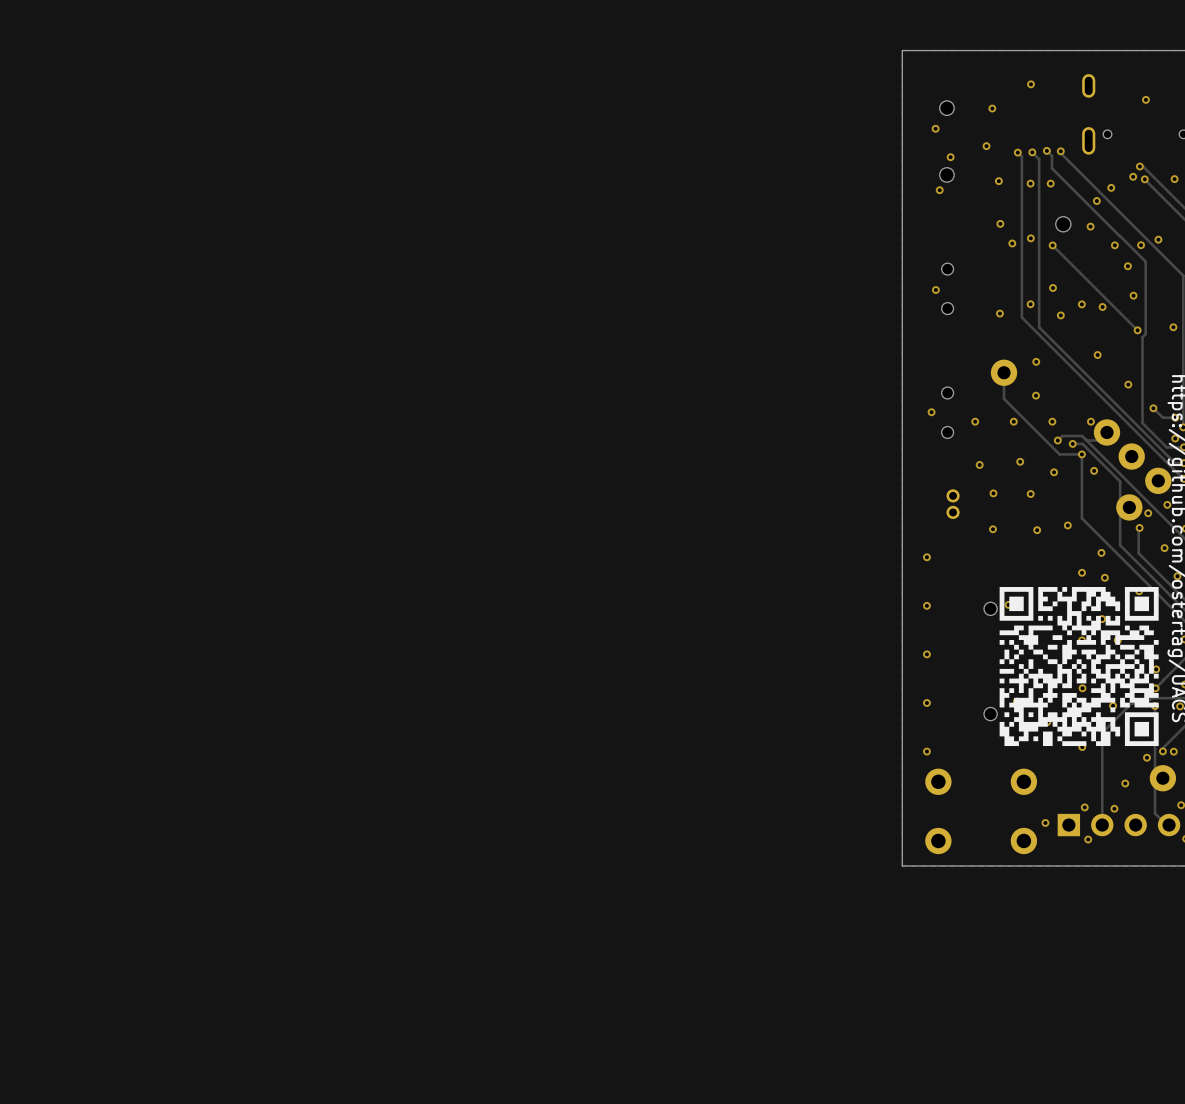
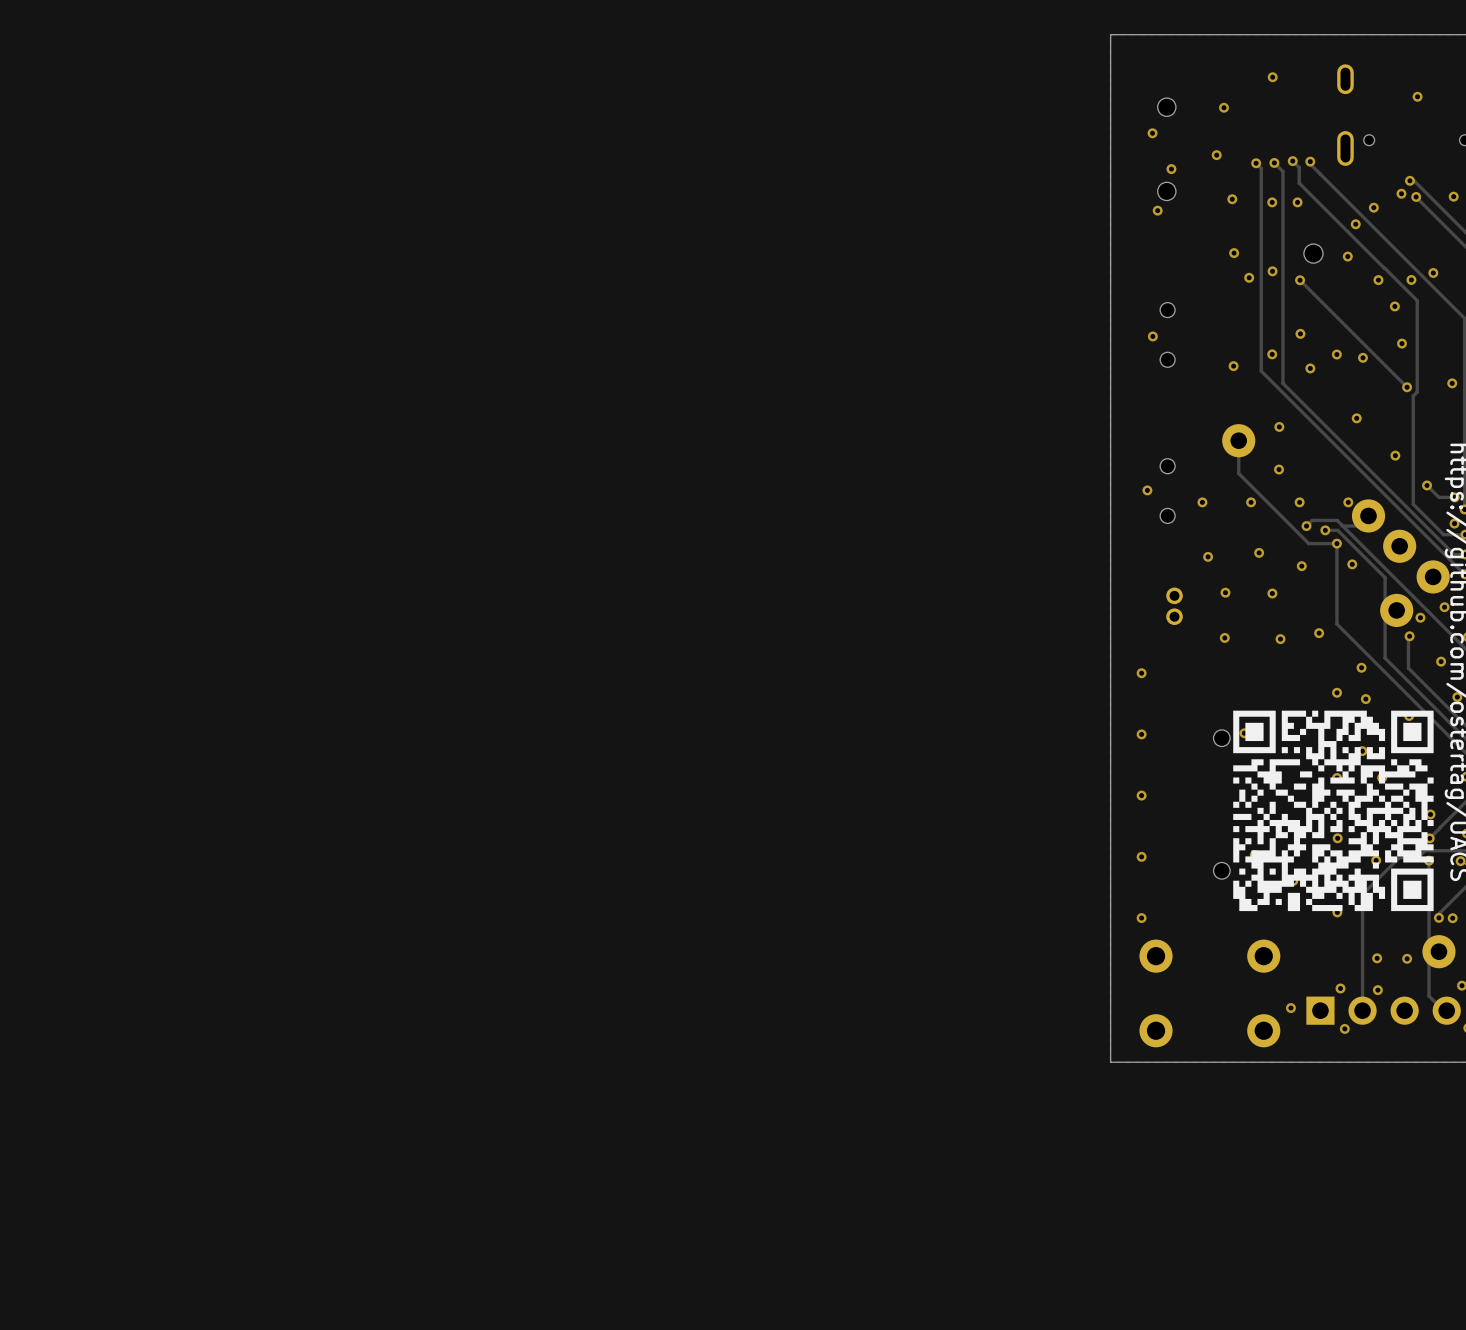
via: (1146, 757) -> none
via: none -> (1377, 958)
via: (1125, 783) -> none
via: none -> (1407, 958)

